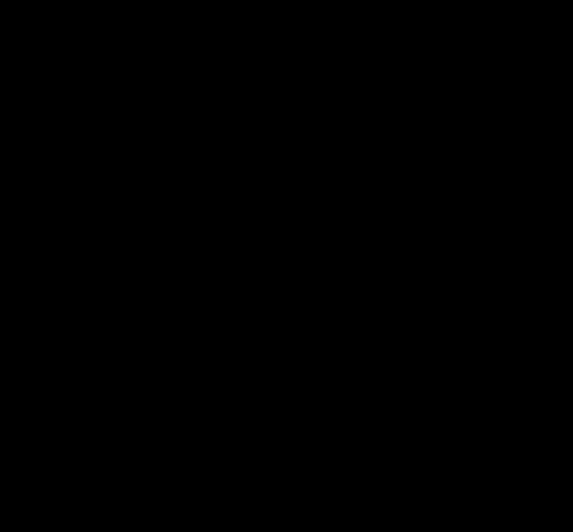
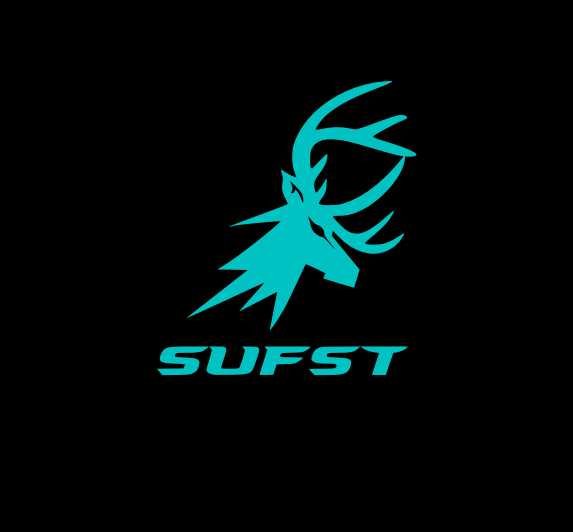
drawing: none -> [156, 80, 417, 376]

